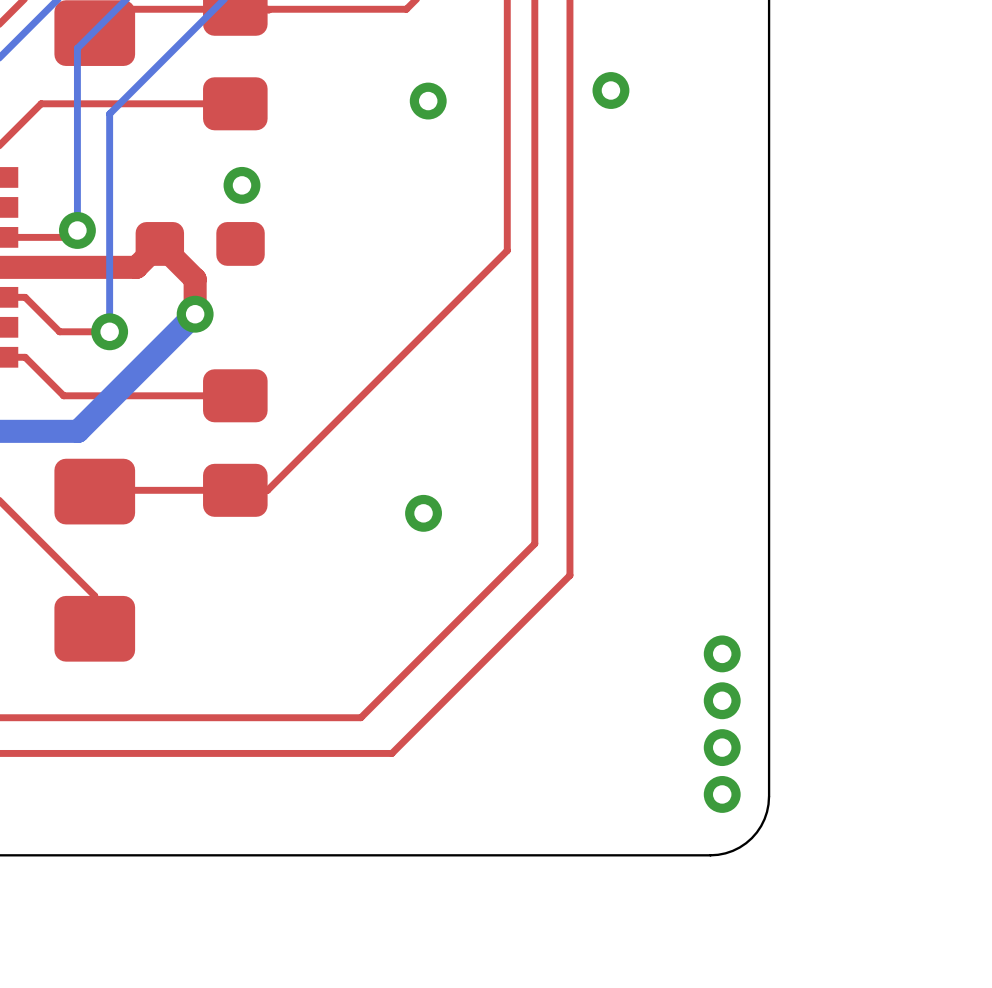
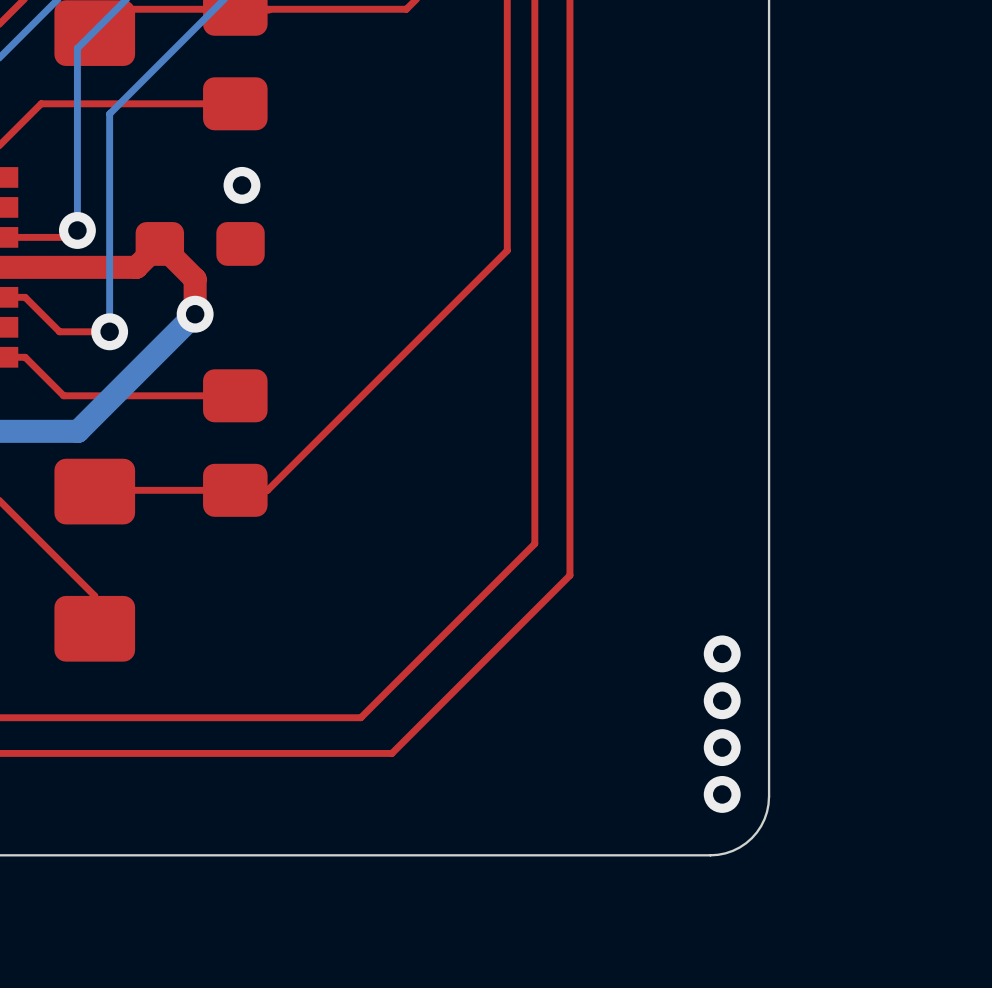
via: (610, 90) -> none
via: (428, 101) -> none
via: (423, 513) -> none

